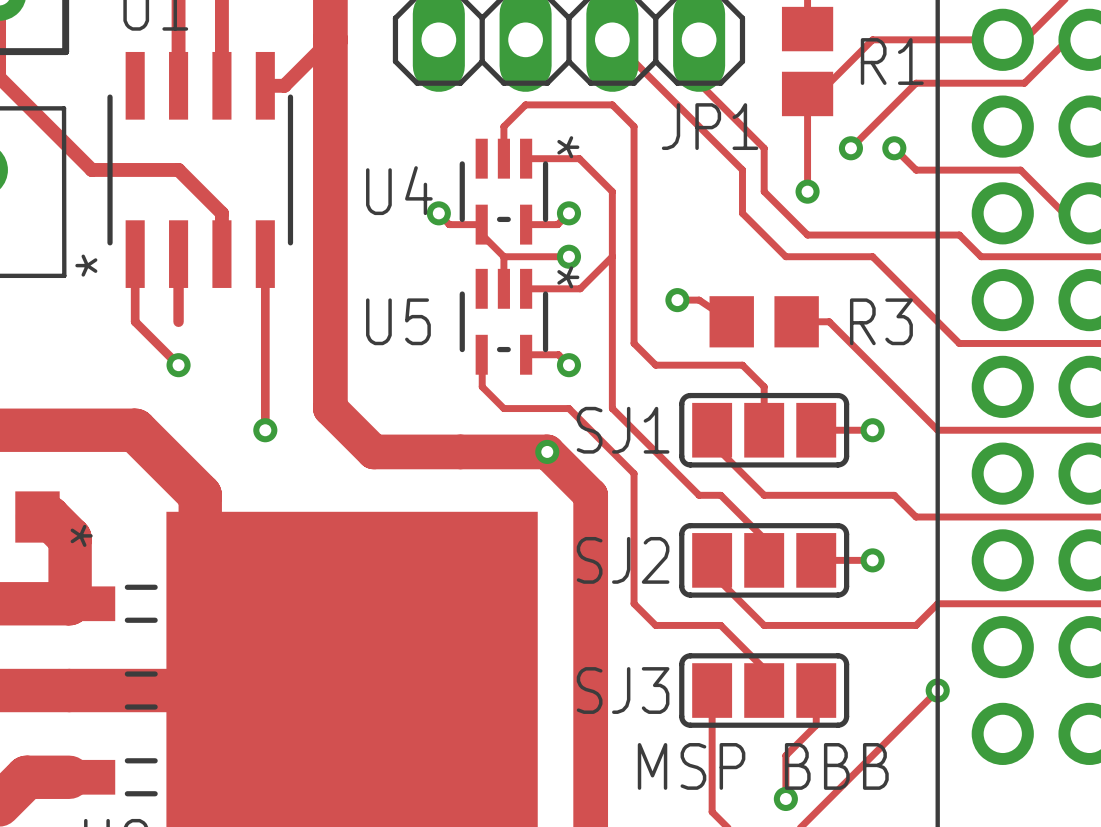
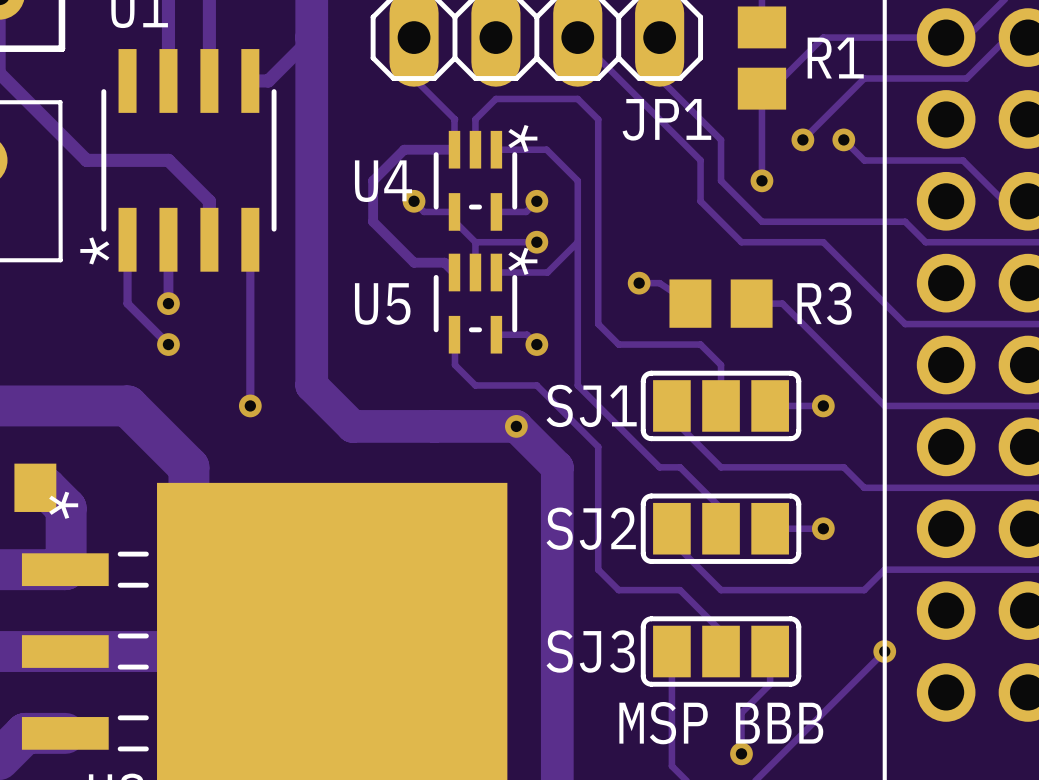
track: none -> (414, 37) (414, 78) (454, 119) (454, 149) (404, 149) (373, 180) (373, 221) (414, 262) (444, 262) (454, 272)
via: none -> (168, 303)

